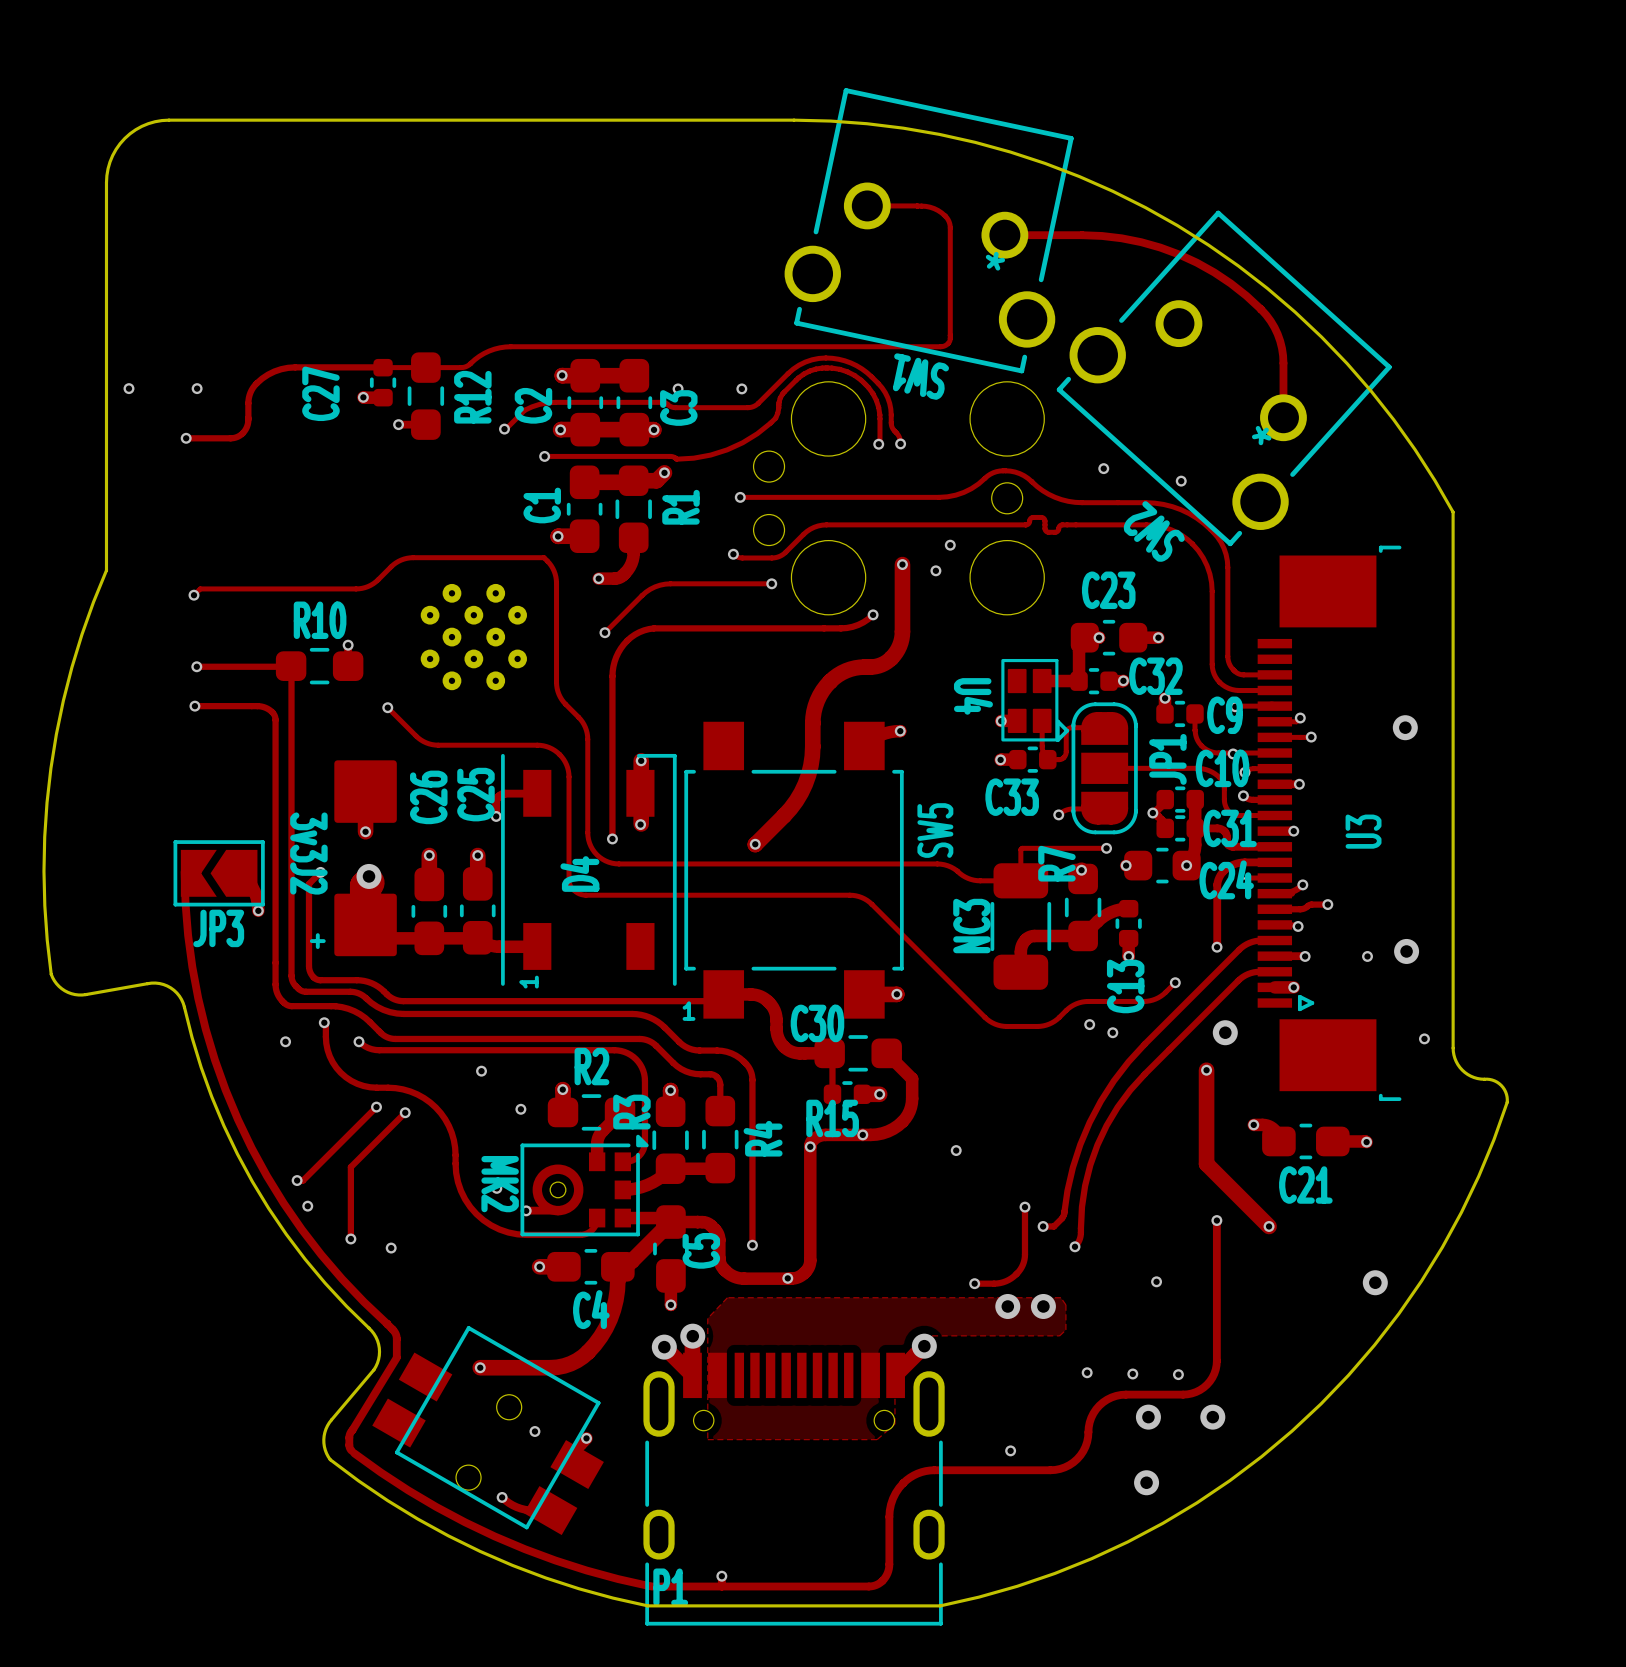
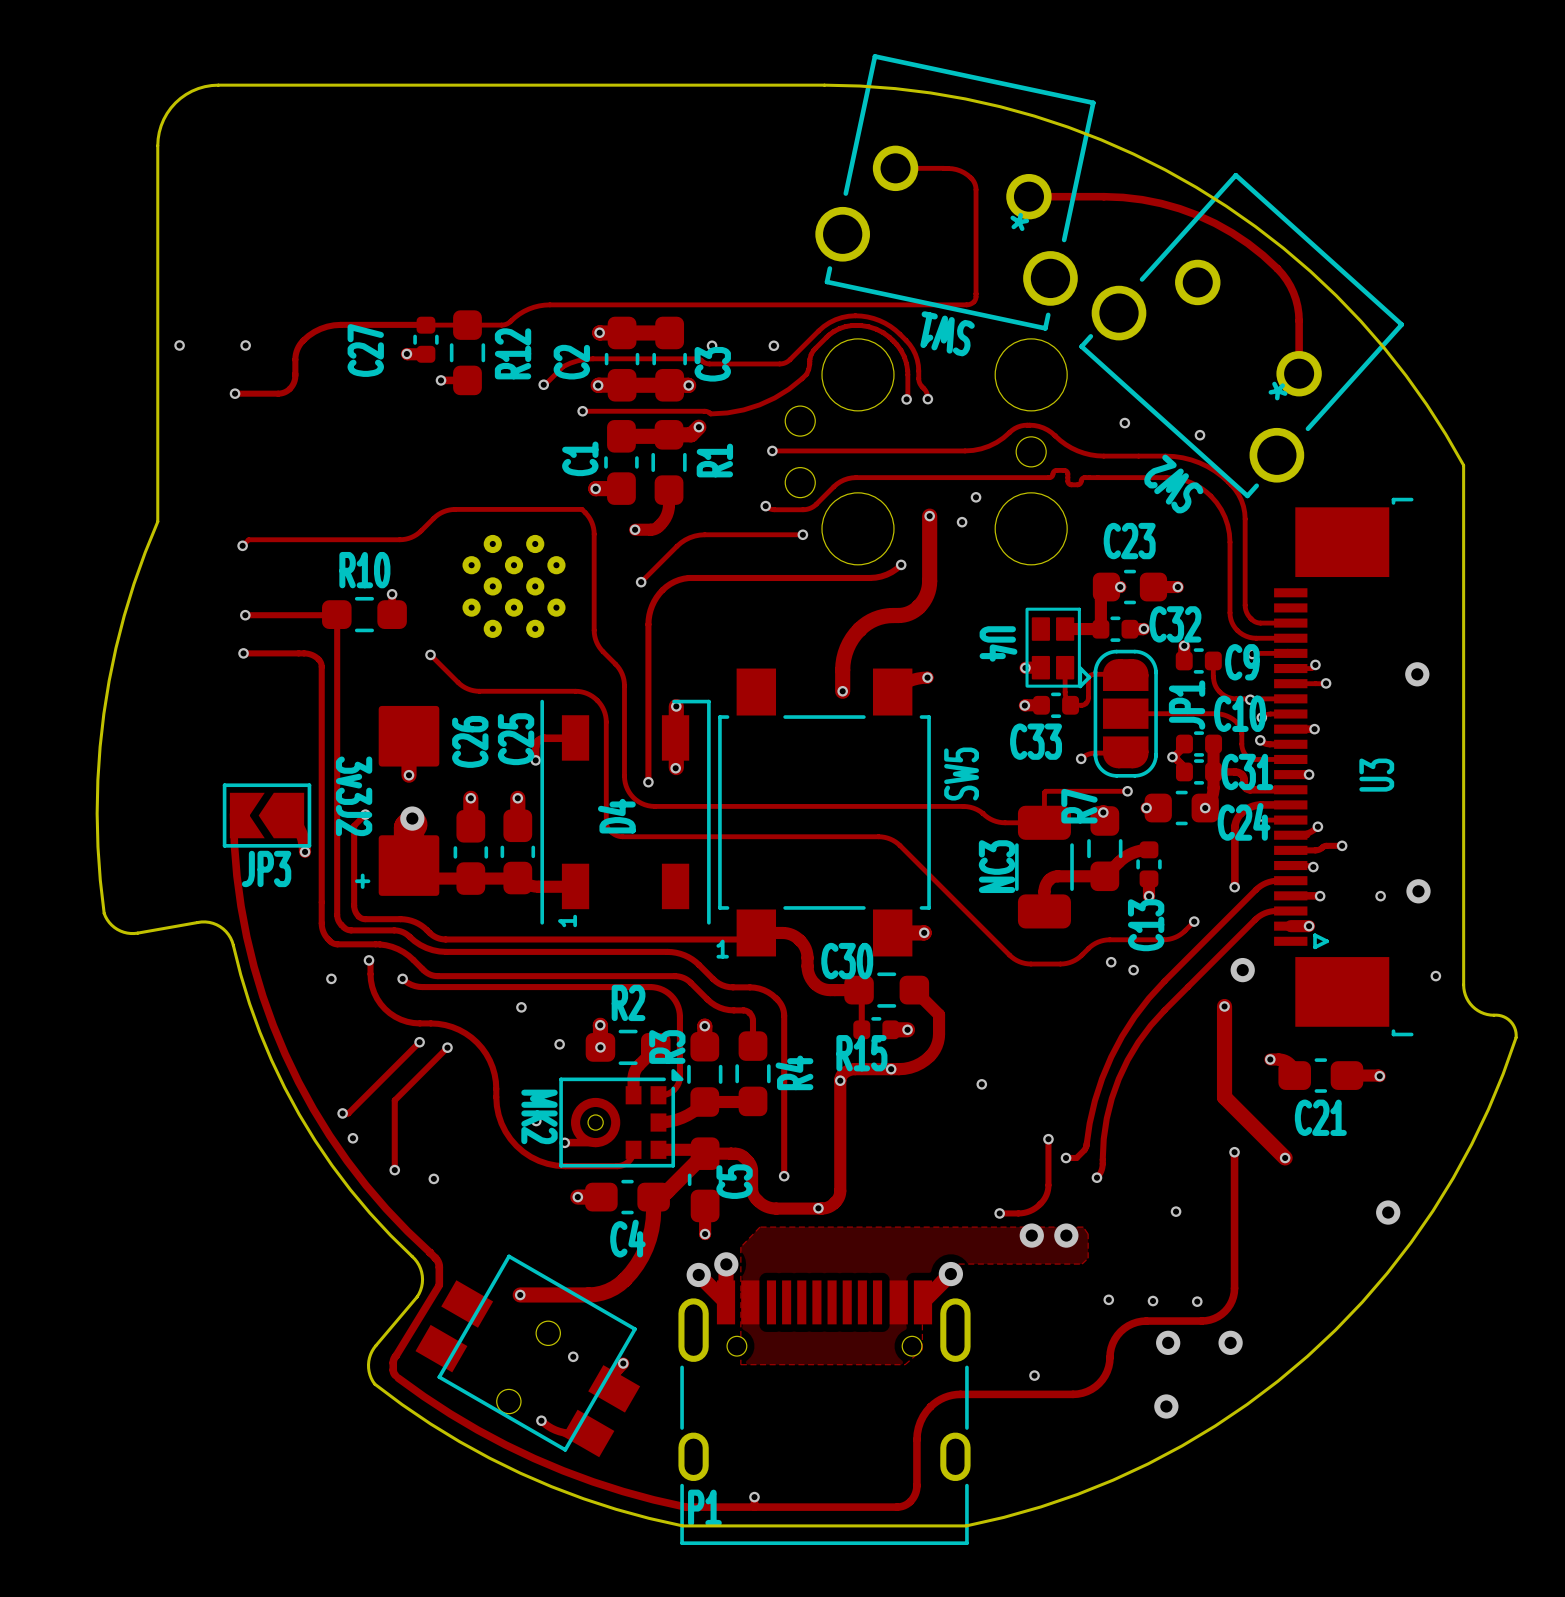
track: (812, 745) (810, 765) (801, 792) (790, 808) (755, 844) -> none
via position: (755, 844) -> (842, 691)
via: none -> (600, 1047)

